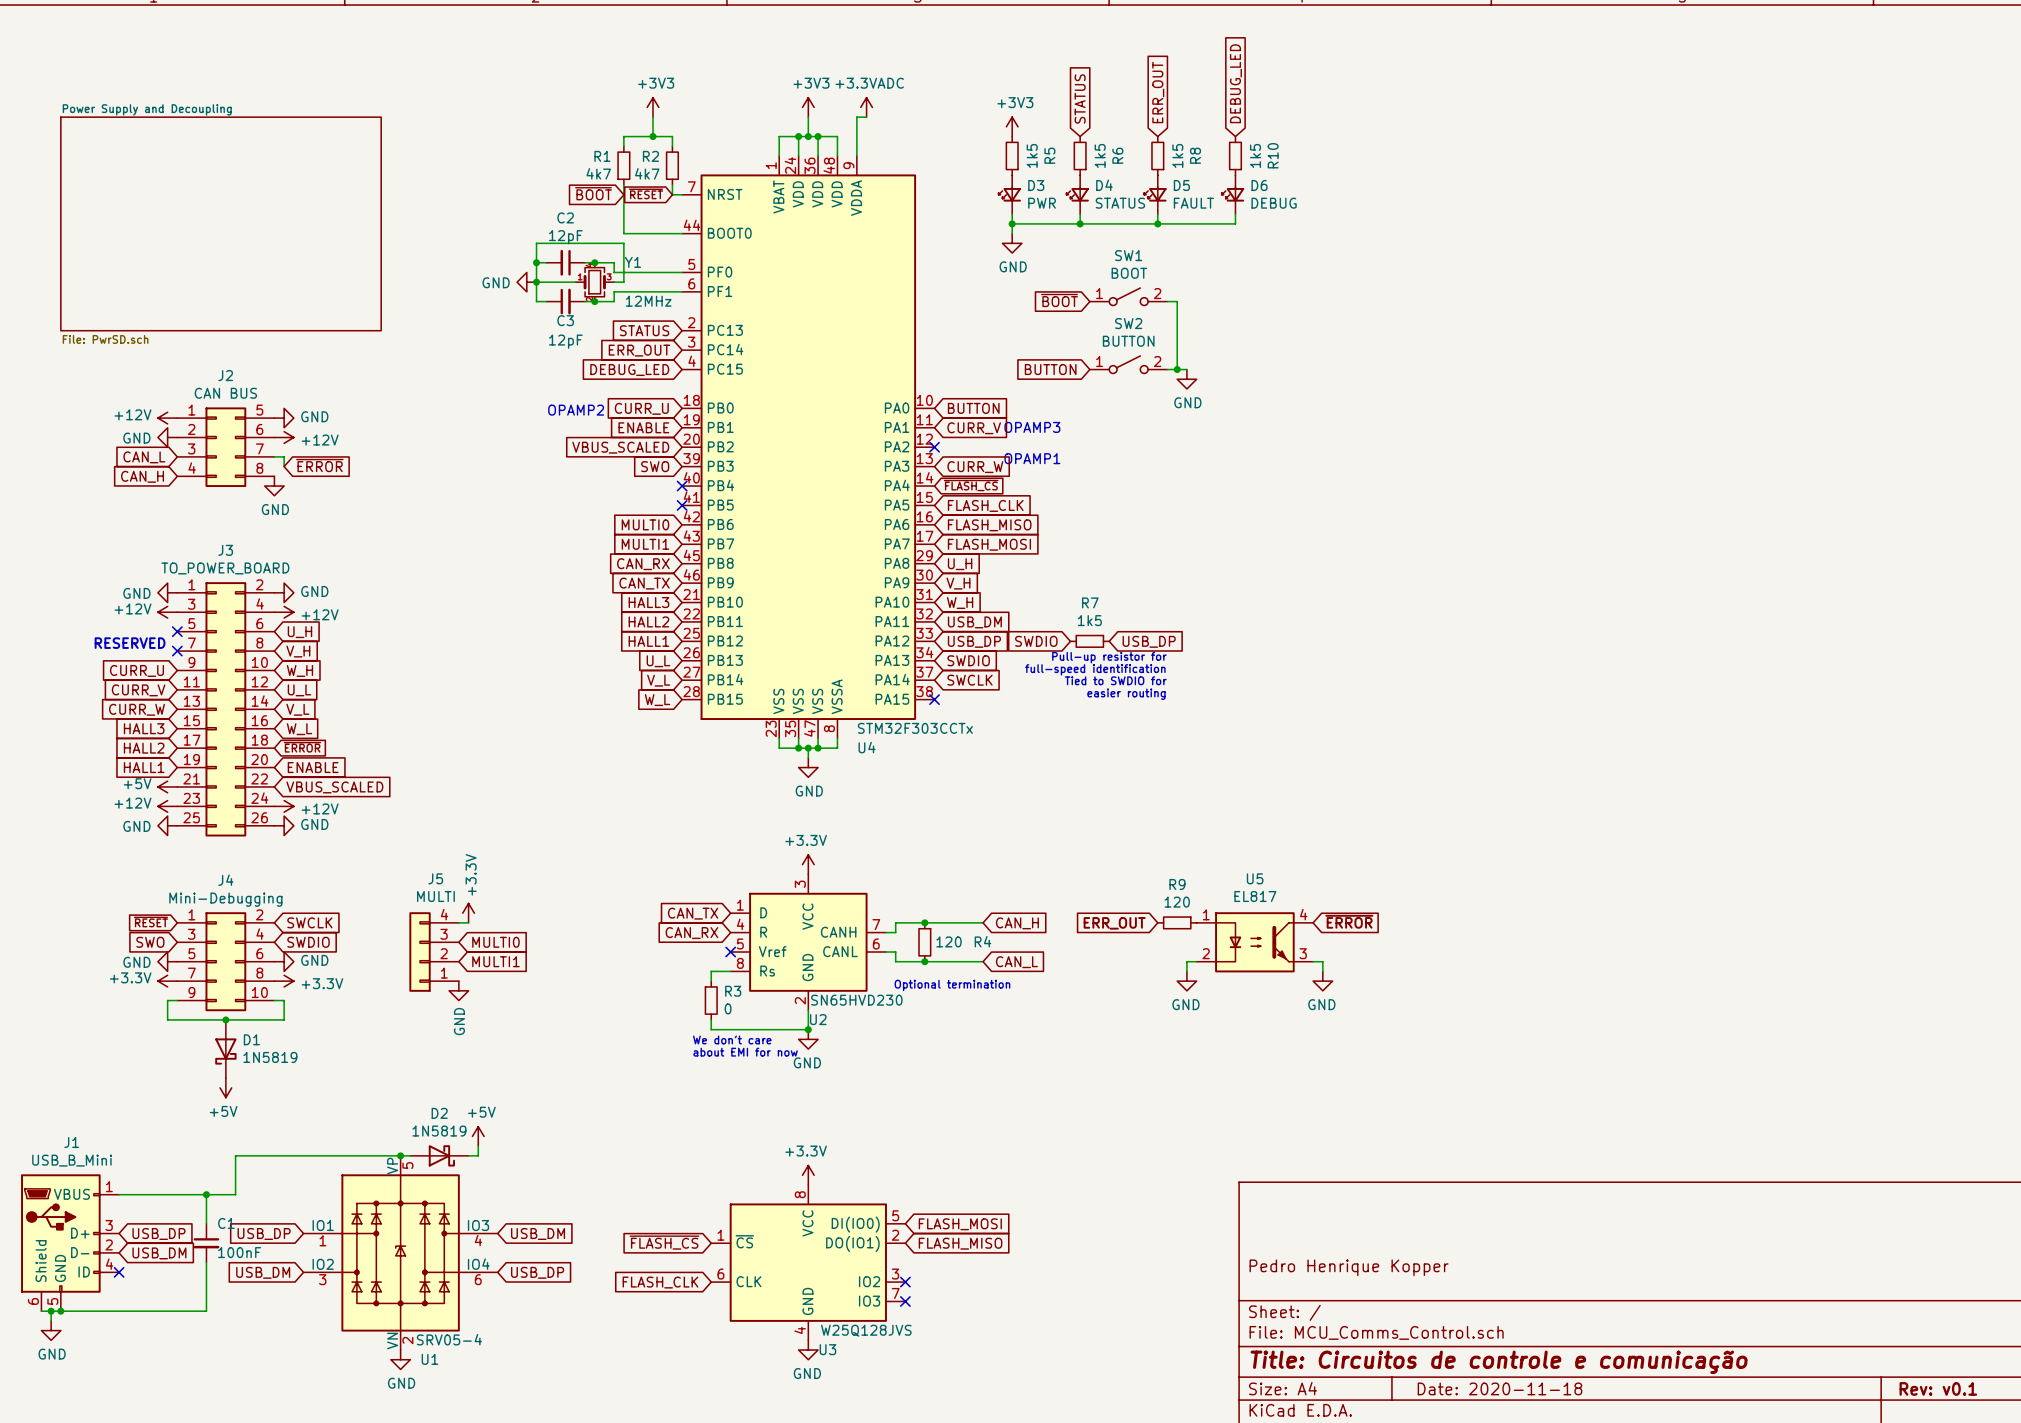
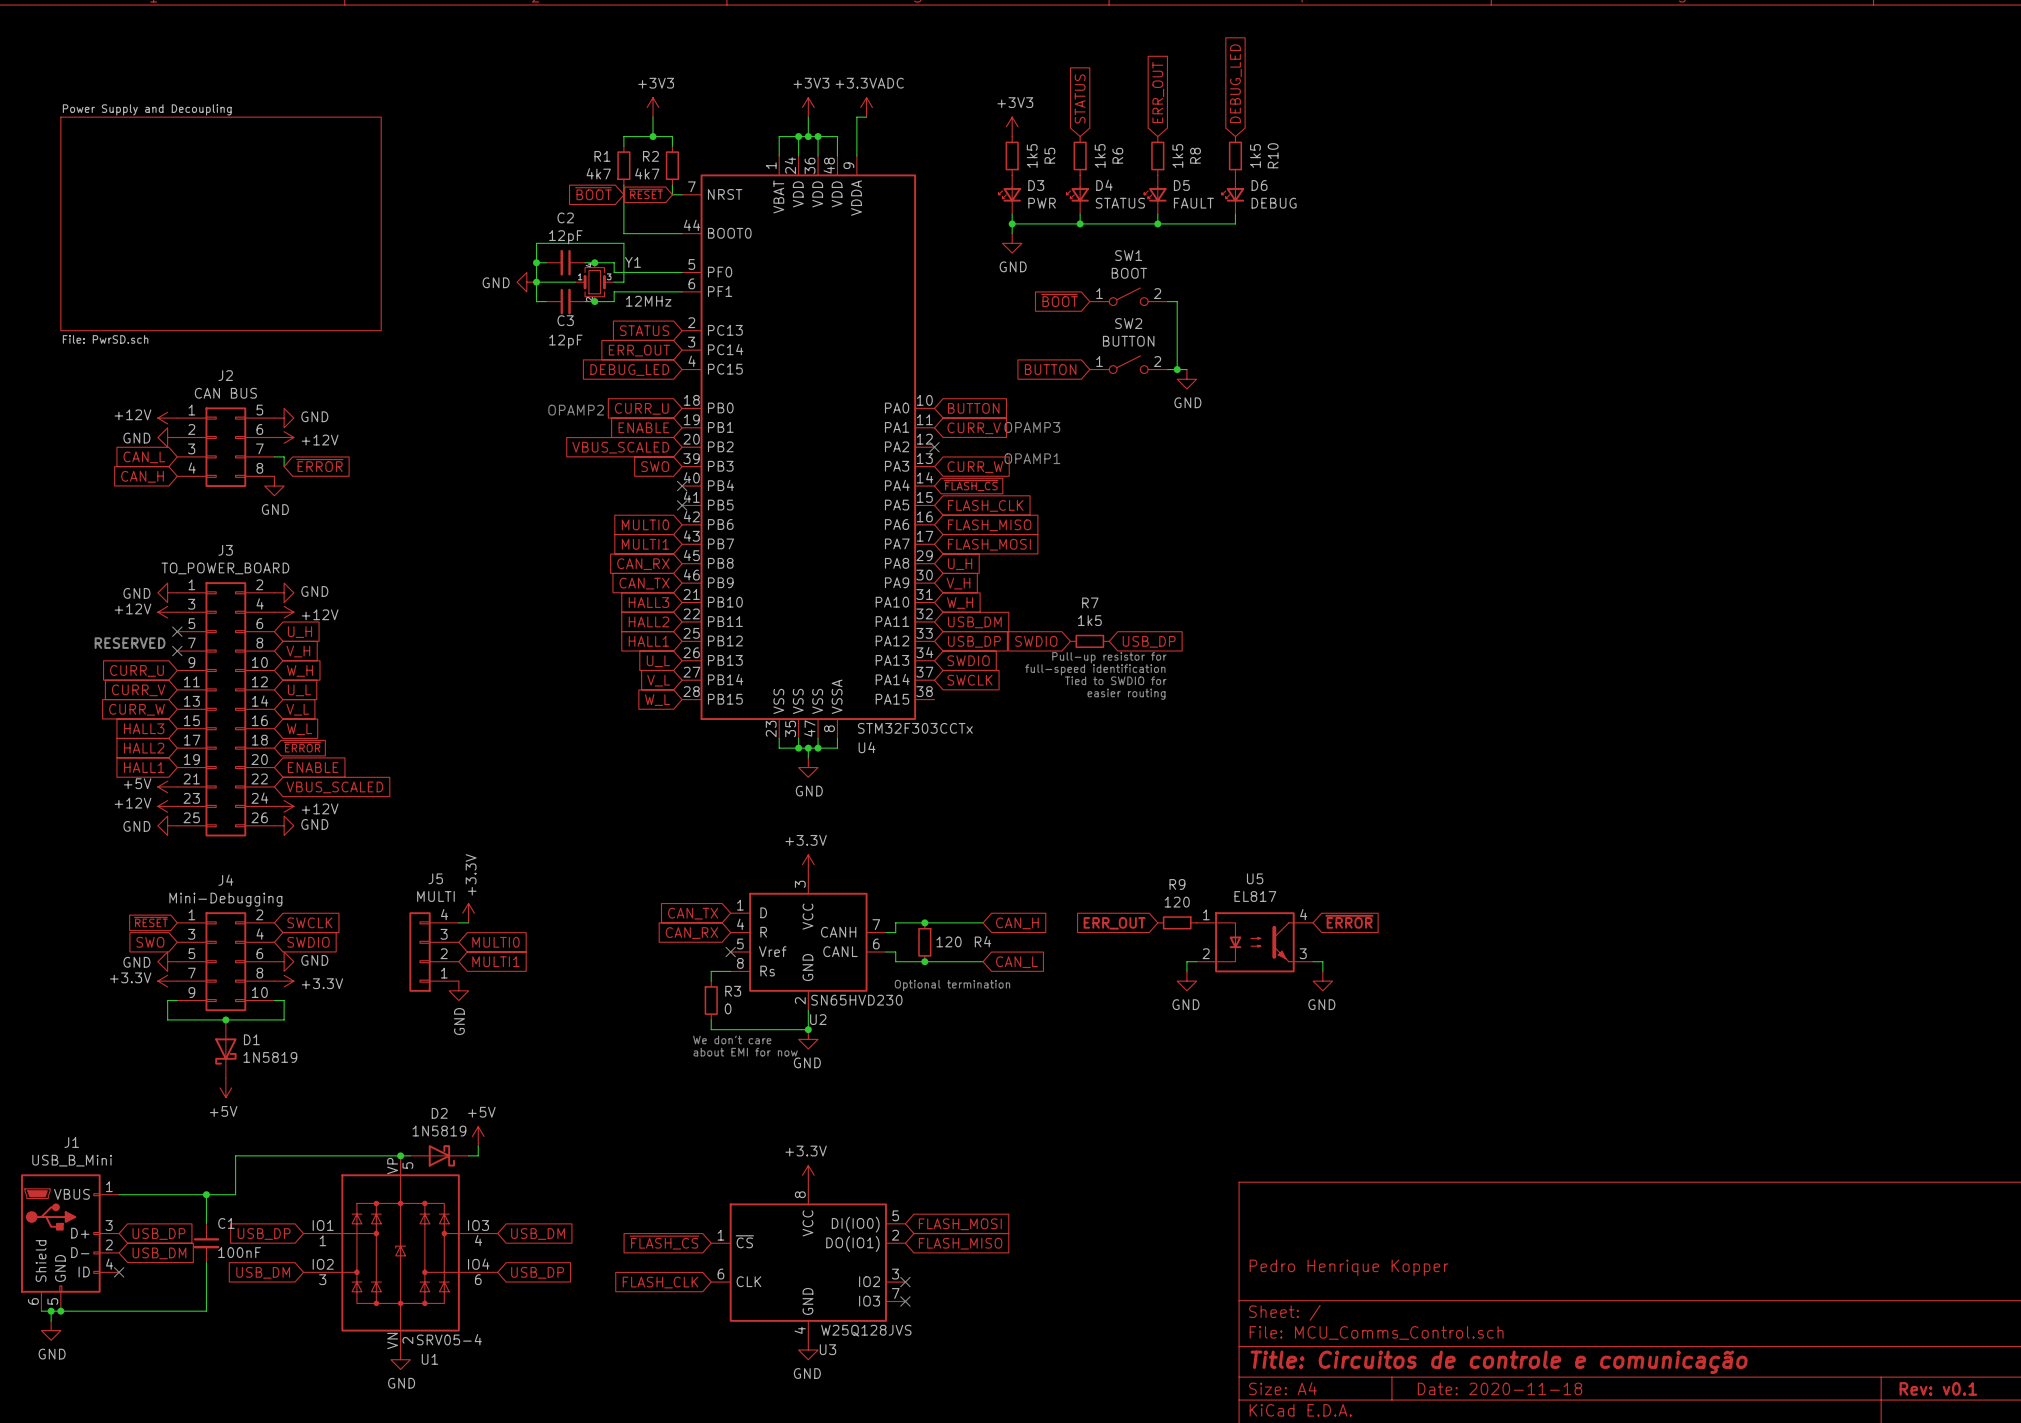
no-connect mark: (934, 699) -> none

